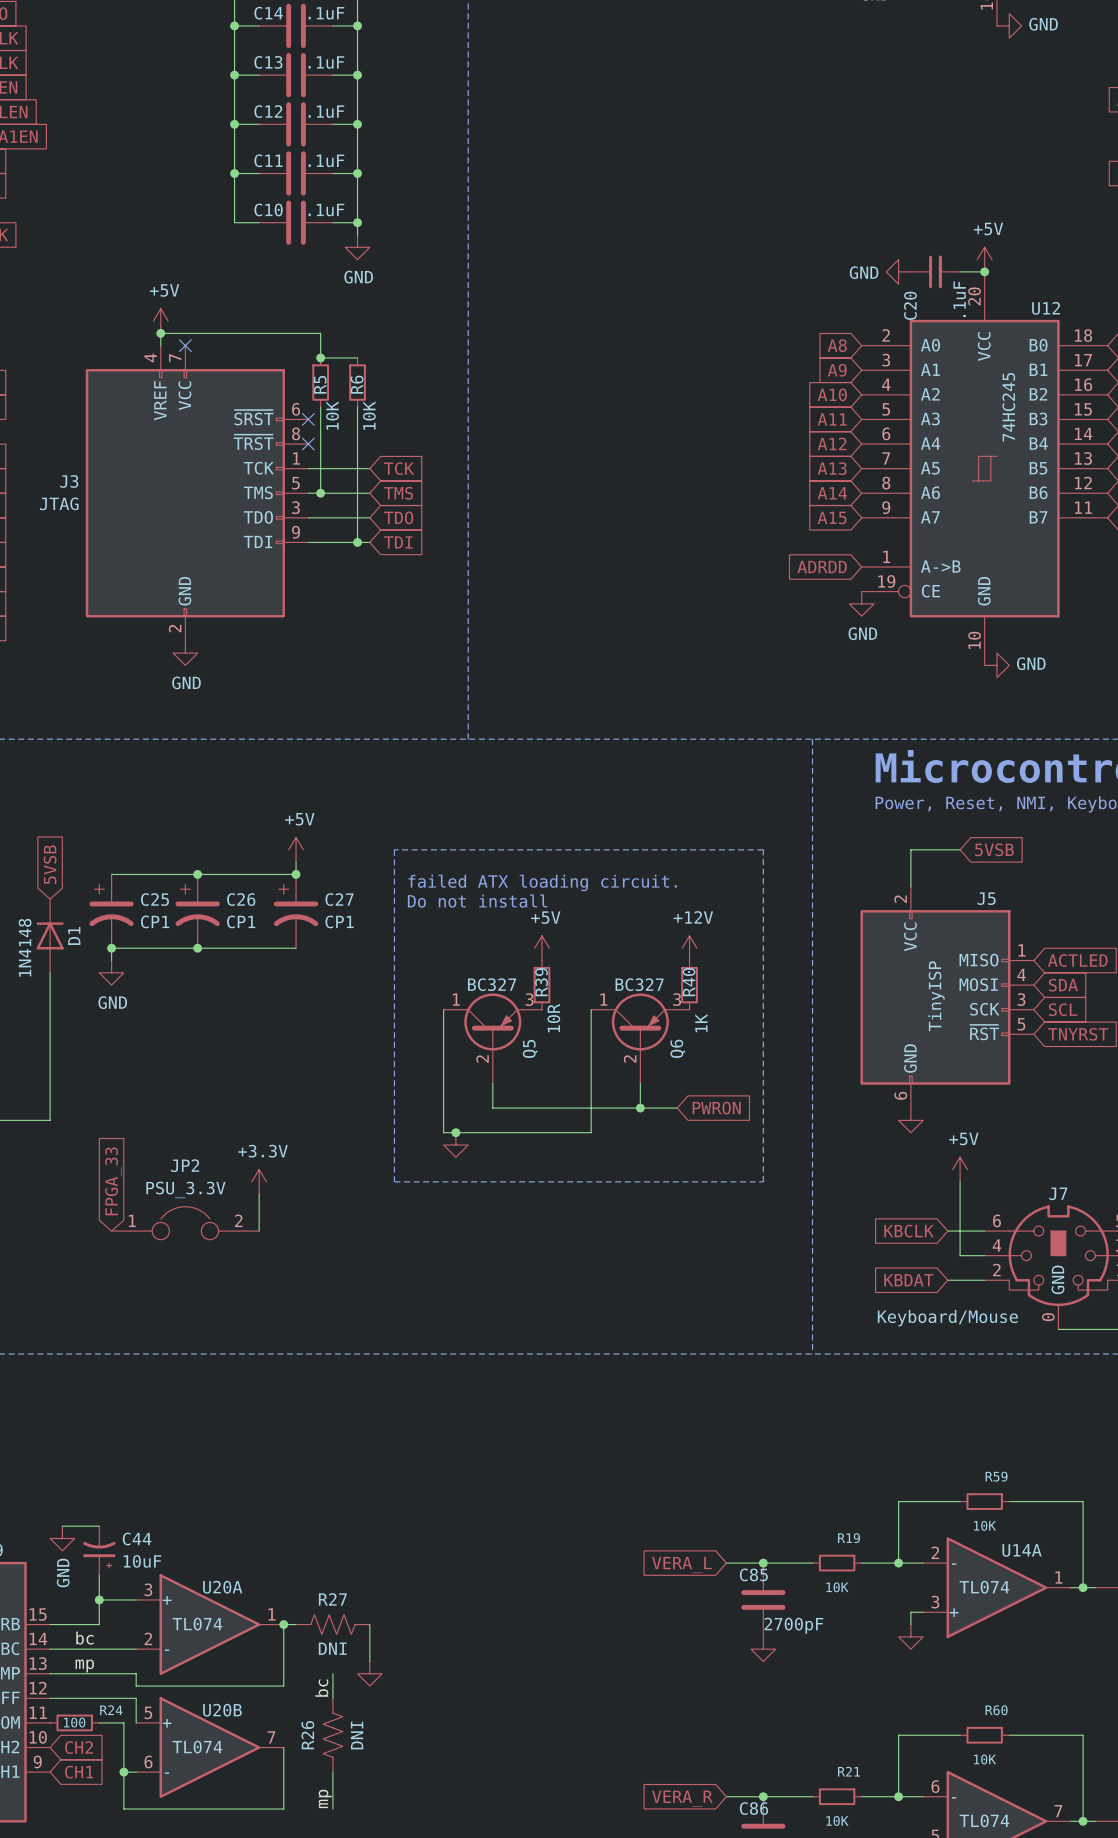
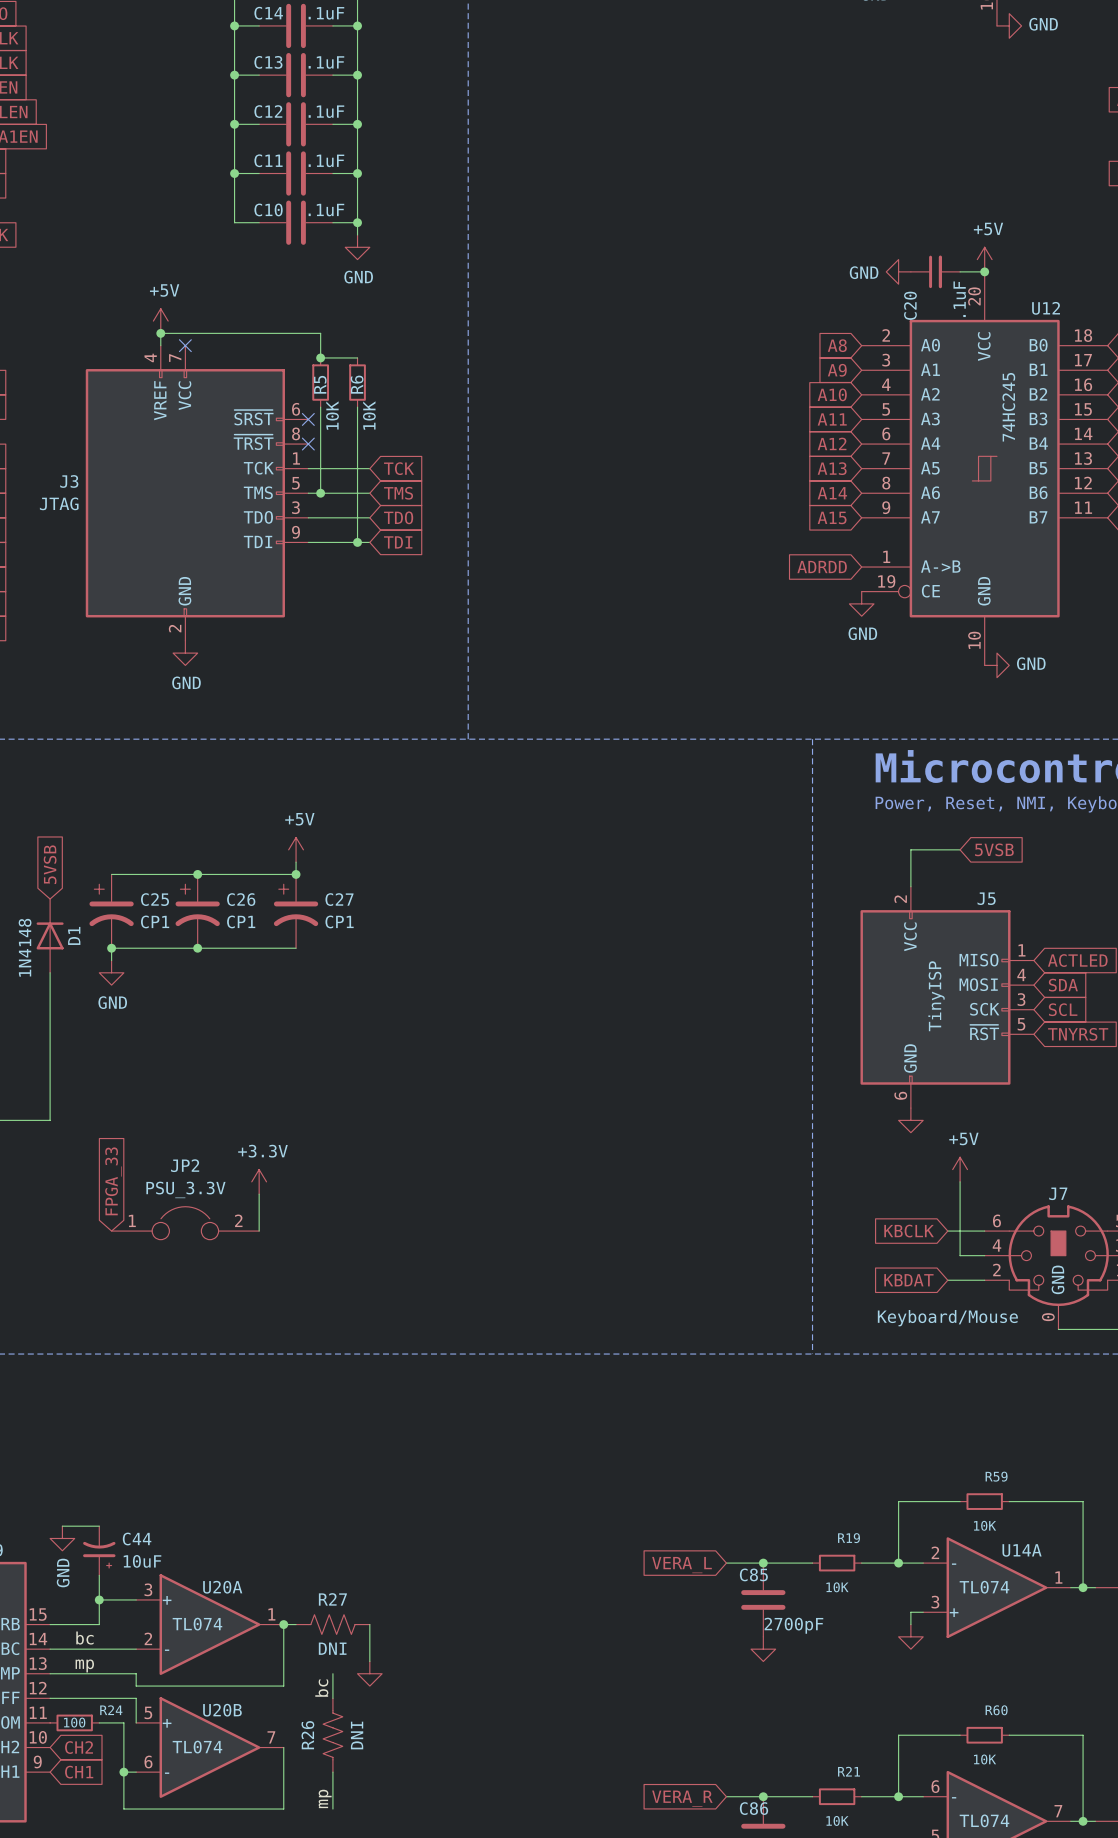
line: (394, 849) (763, 849) (763, 1181) (394, 1181) (394, 849) -> none
text: failed ATX loading circuit. (542, 882) -> none
text: Do not install (477, 901) -> none
power symbol: +5V (541, 948) -> none
power symbol: +12V (689, 948) -> none
R39: 10R (541, 985) -> none
R40: 1K (689, 985) -> none
wire: (443, 1009) (443, 1132) (591, 1132) (591, 1009) -> none
Q5: BC327 (492, 1038) -> none
Q6: BC327 (640, 1038) -> none
wire: (492, 1083) (492, 1108) (677, 1108) -> none
wire: (640, 1083) (640, 1108) -> none
junction: (640, 1108) -> none
global label: PWRON (716, 1108) -> none
junction: (455, 1132) -> none
power symbol: (455, 1144) -> none

